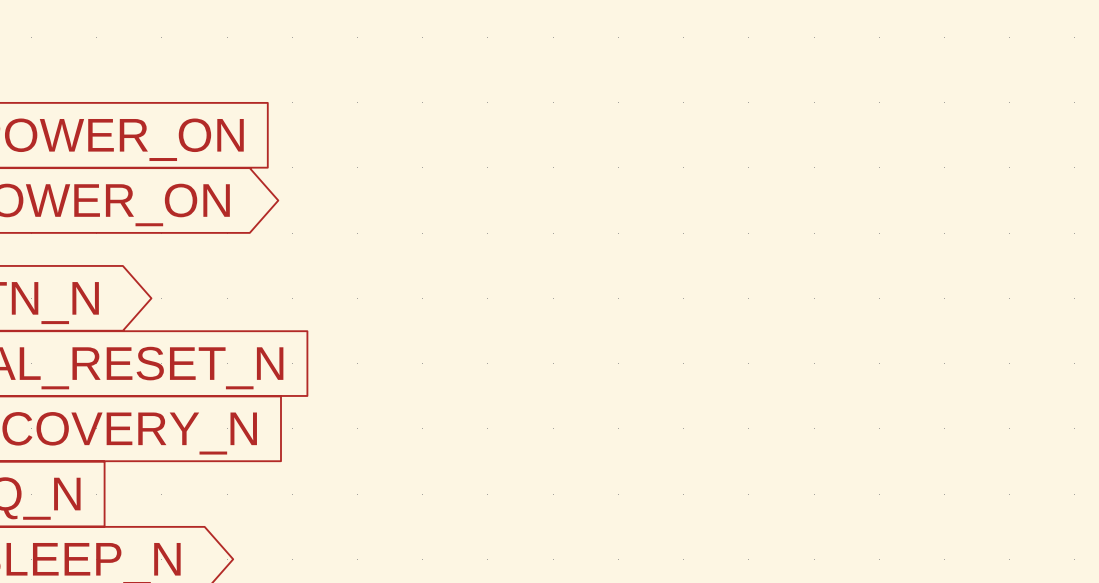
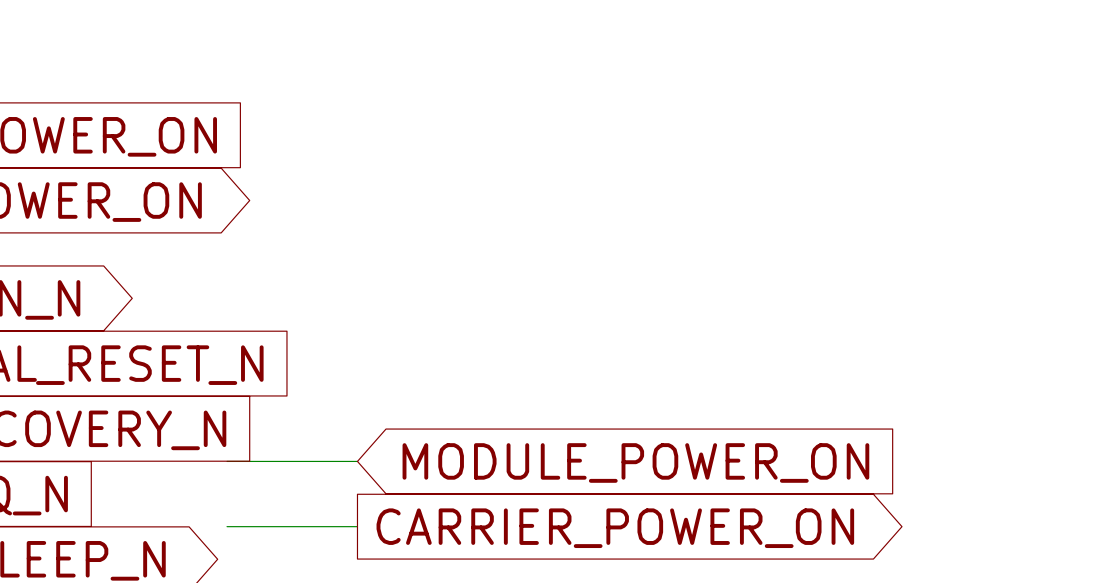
wire: none -> (227, 461) (357, 461)
global label: none -> MODULE_POWER_ON (635, 462)
wire: none -> (227, 526) (357, 526)
global label: none -> CARRIER_POWER_ON (615, 528)

